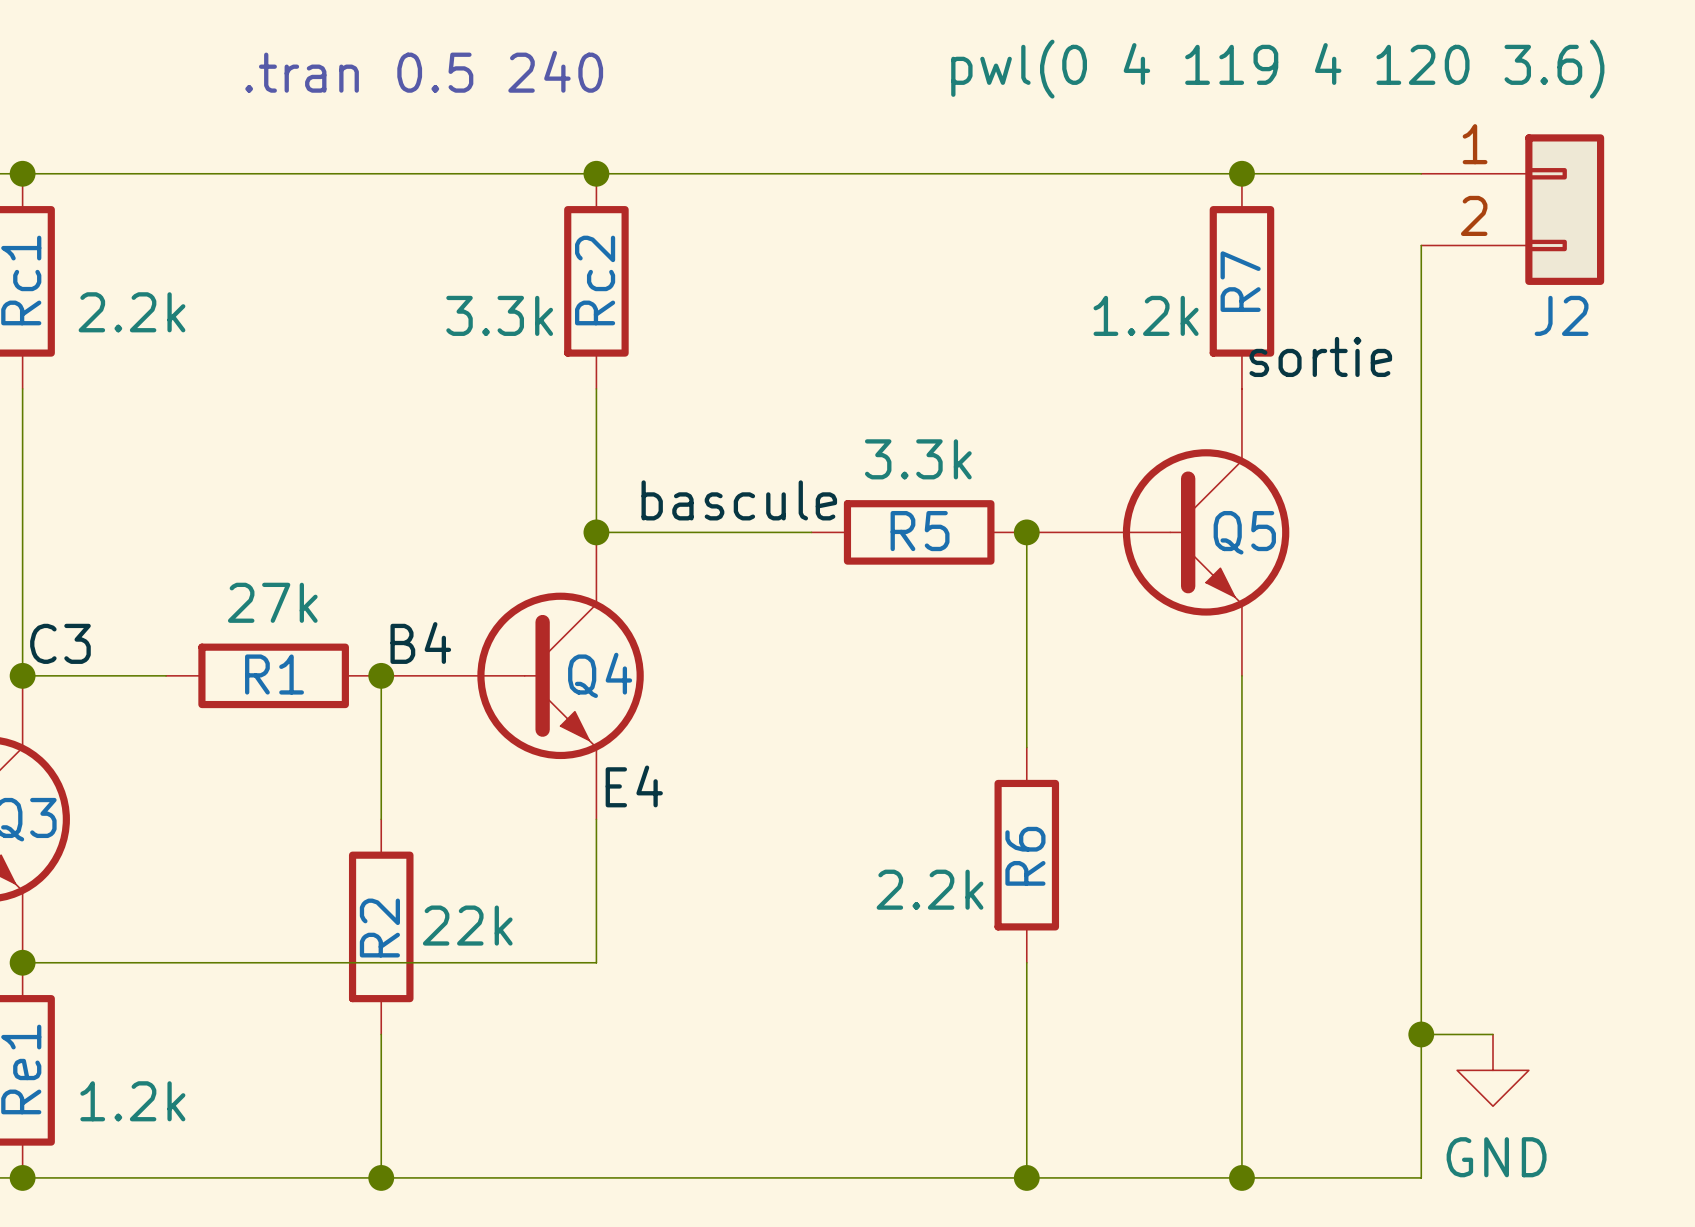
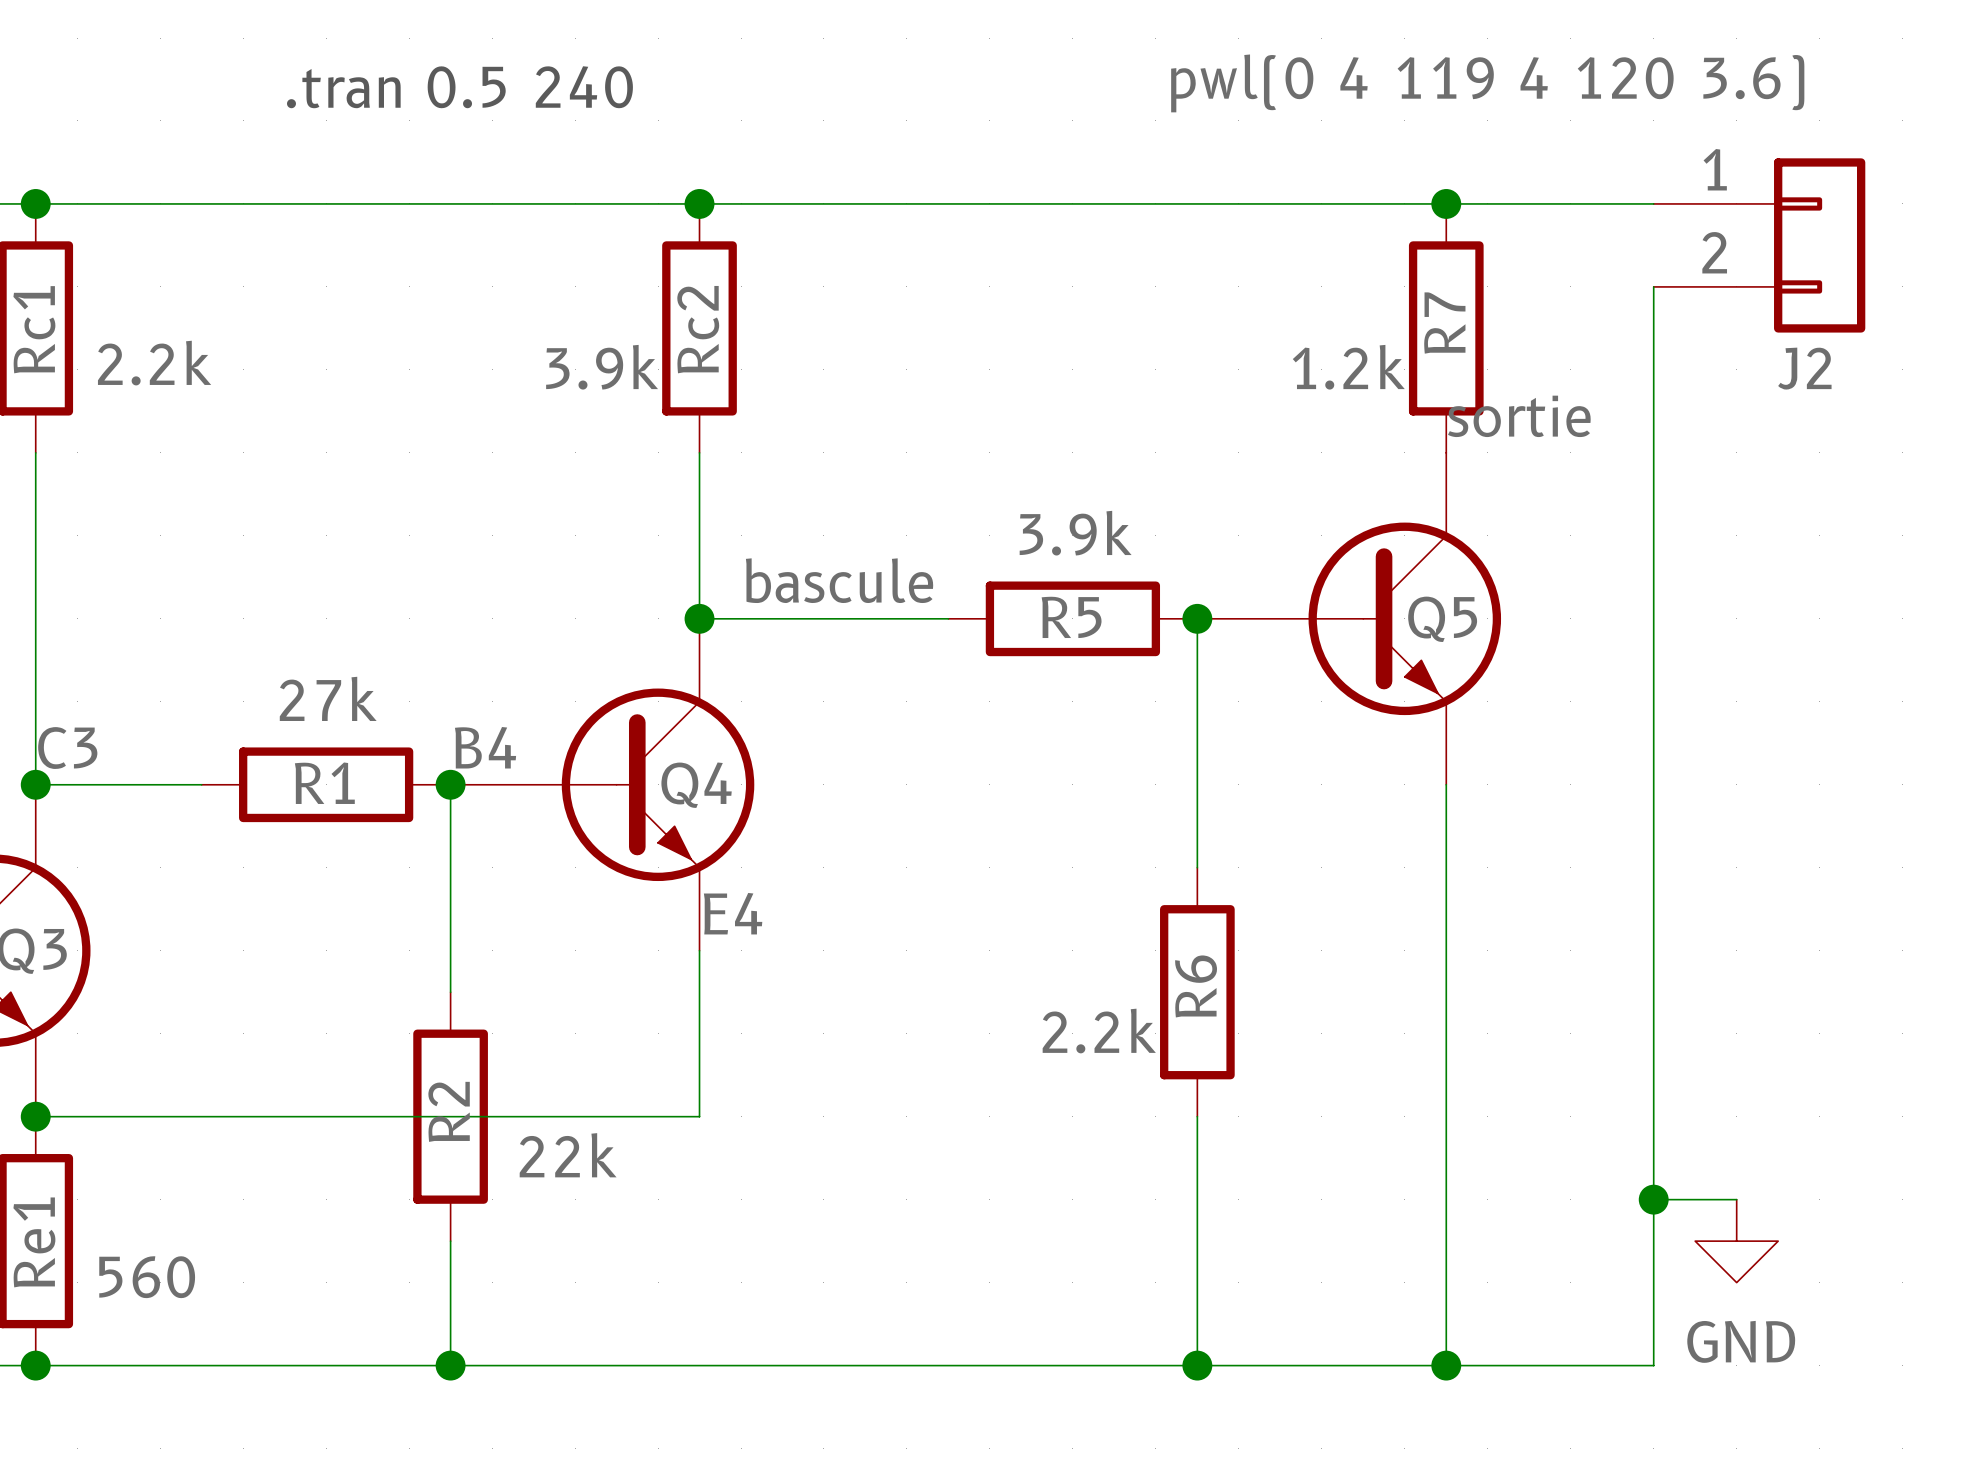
Rc2 value: 3.3k (499, 315) -> 3.9k (602, 367)
R5 value: 3.3k (918, 459) -> 3.9k (1075, 533)
R2 value position: 22k (467, 925) -> 22k (568, 1155)
R2 position: (381, 926) -> (450, 1116)
Re1 value: 1.2k (132, 1101) -> 560 (147, 1277)

